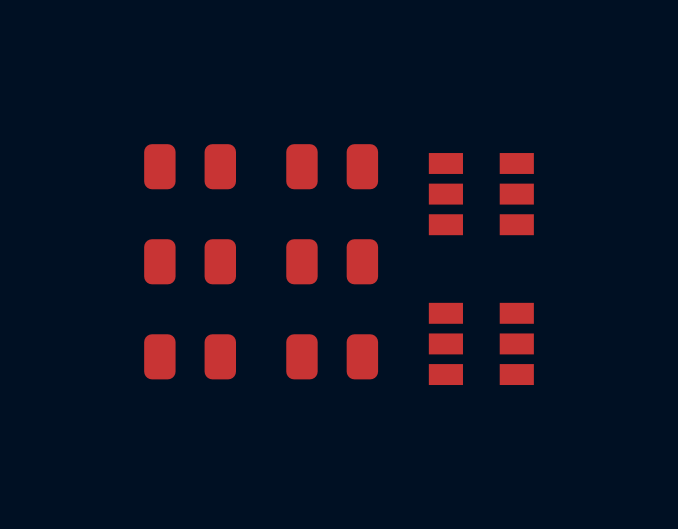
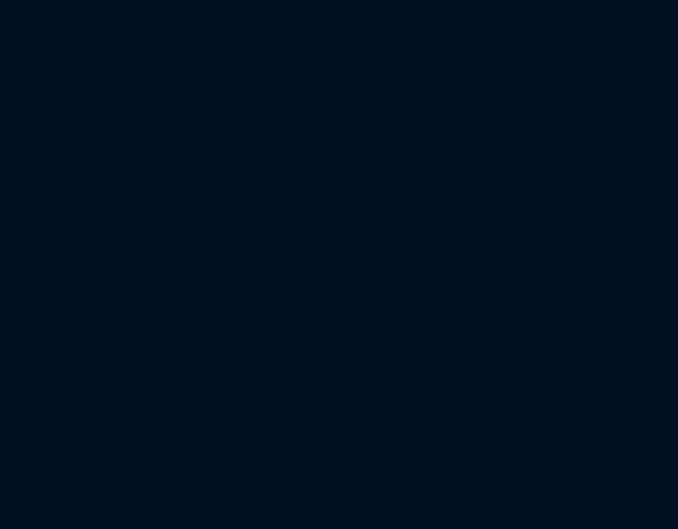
part: (190, 166) -> none
part: (332, 166) -> none
part: (481, 194) -> none
part: (190, 261) -> none
part: (332, 261) -> none
part: (481, 343) -> none
part: (190, 356) -> none
part: (332, 356) -> none

